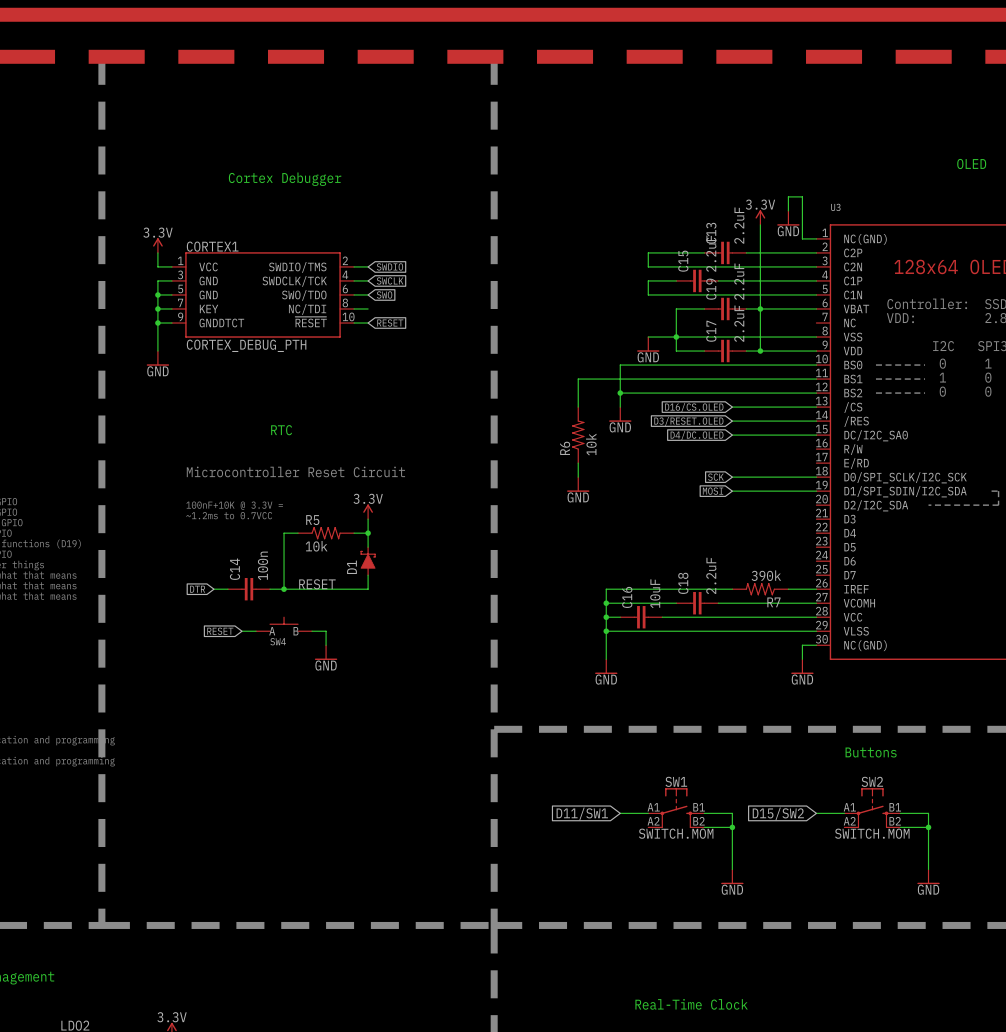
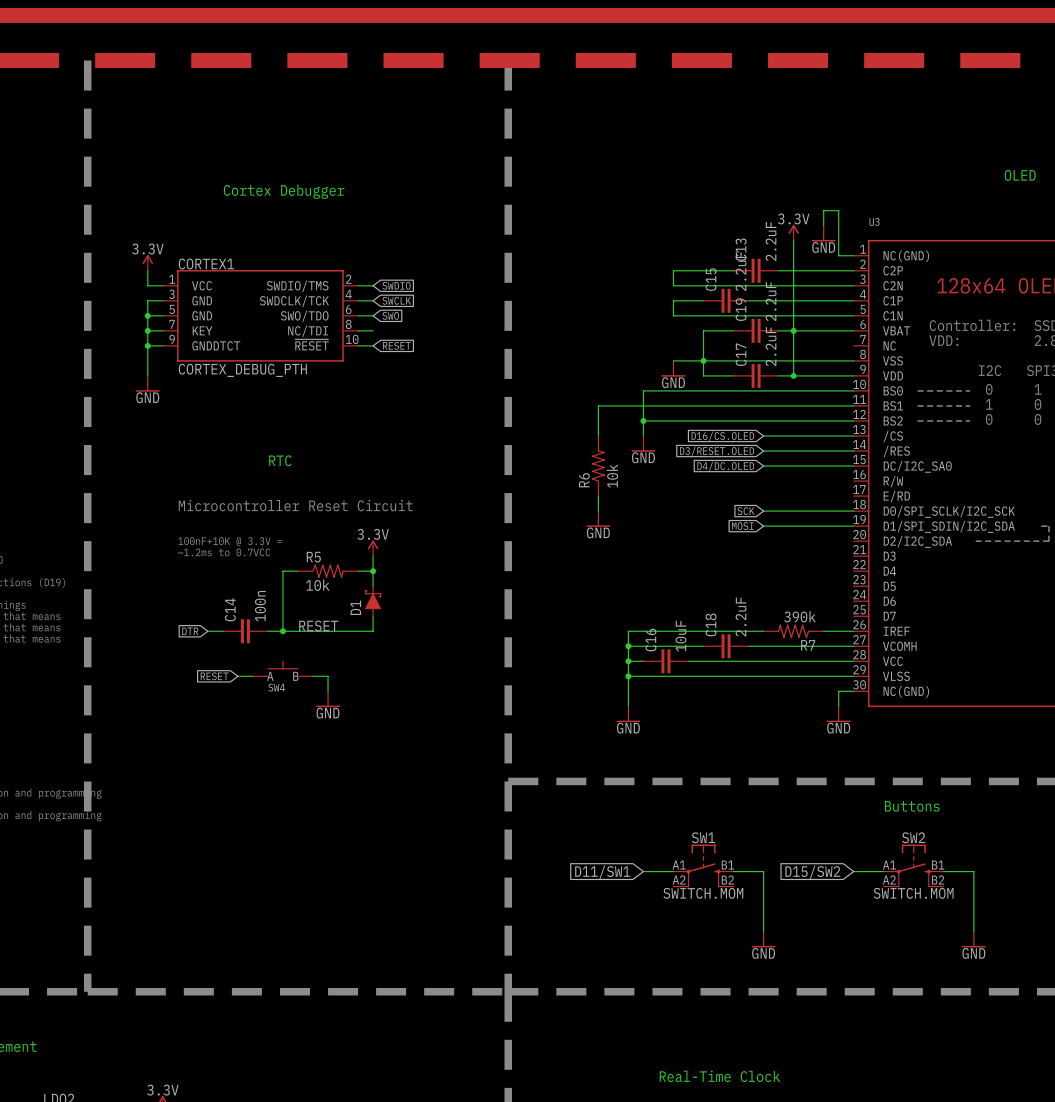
wire: (704, 827) (732, 827) -> none
junction: (732, 827) -> none
wire: (900, 827) (928, 827) -> none
junction: (928, 827) -> none

